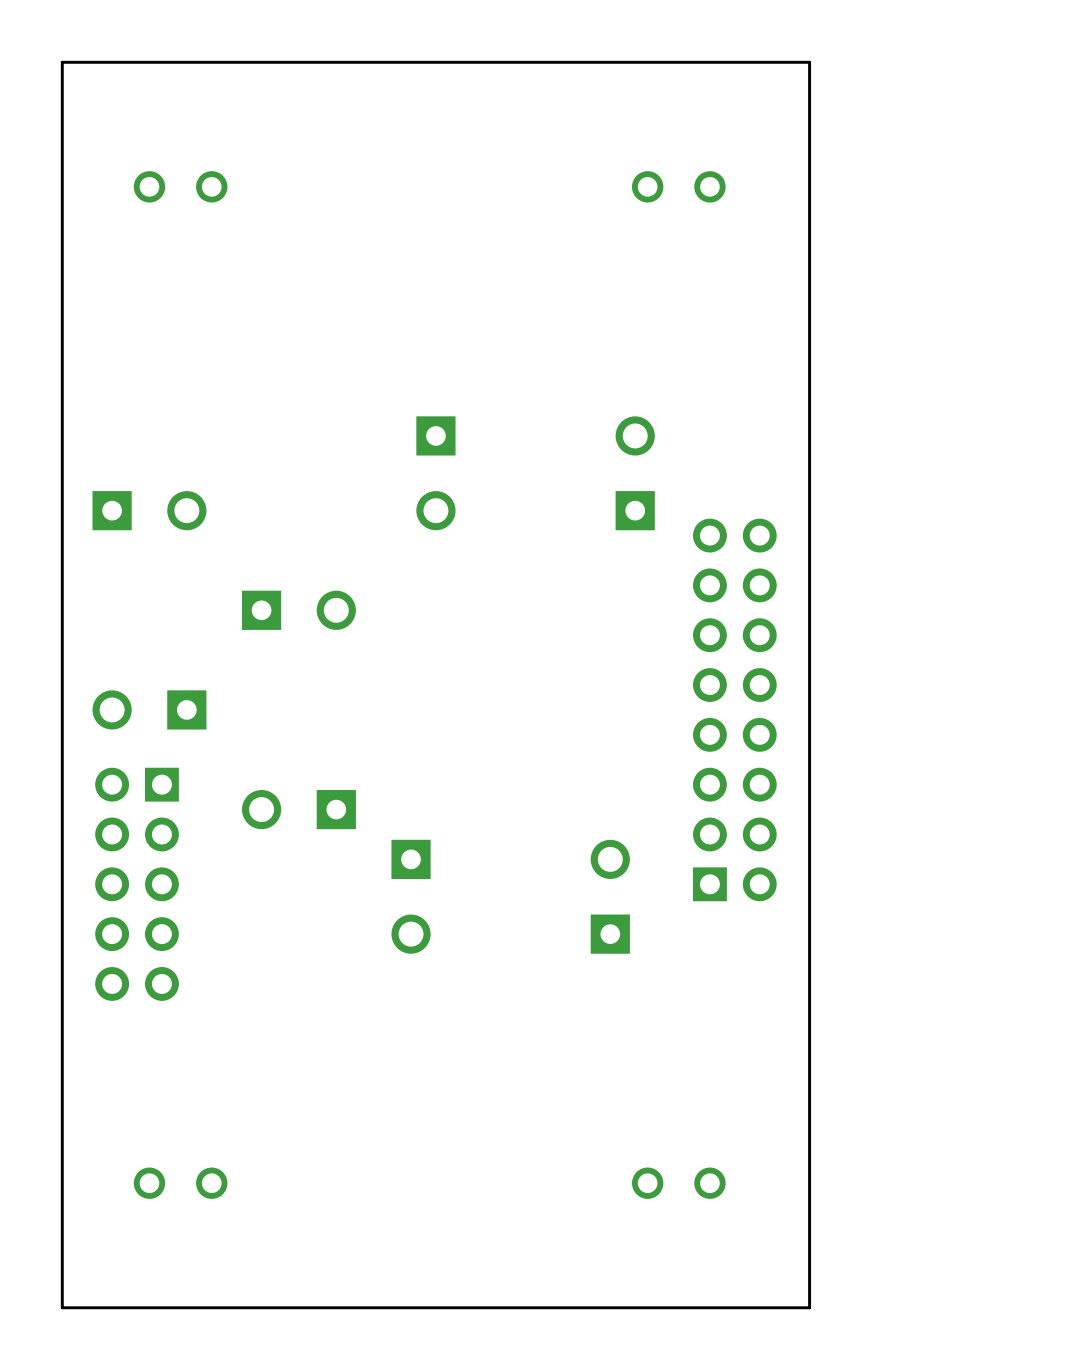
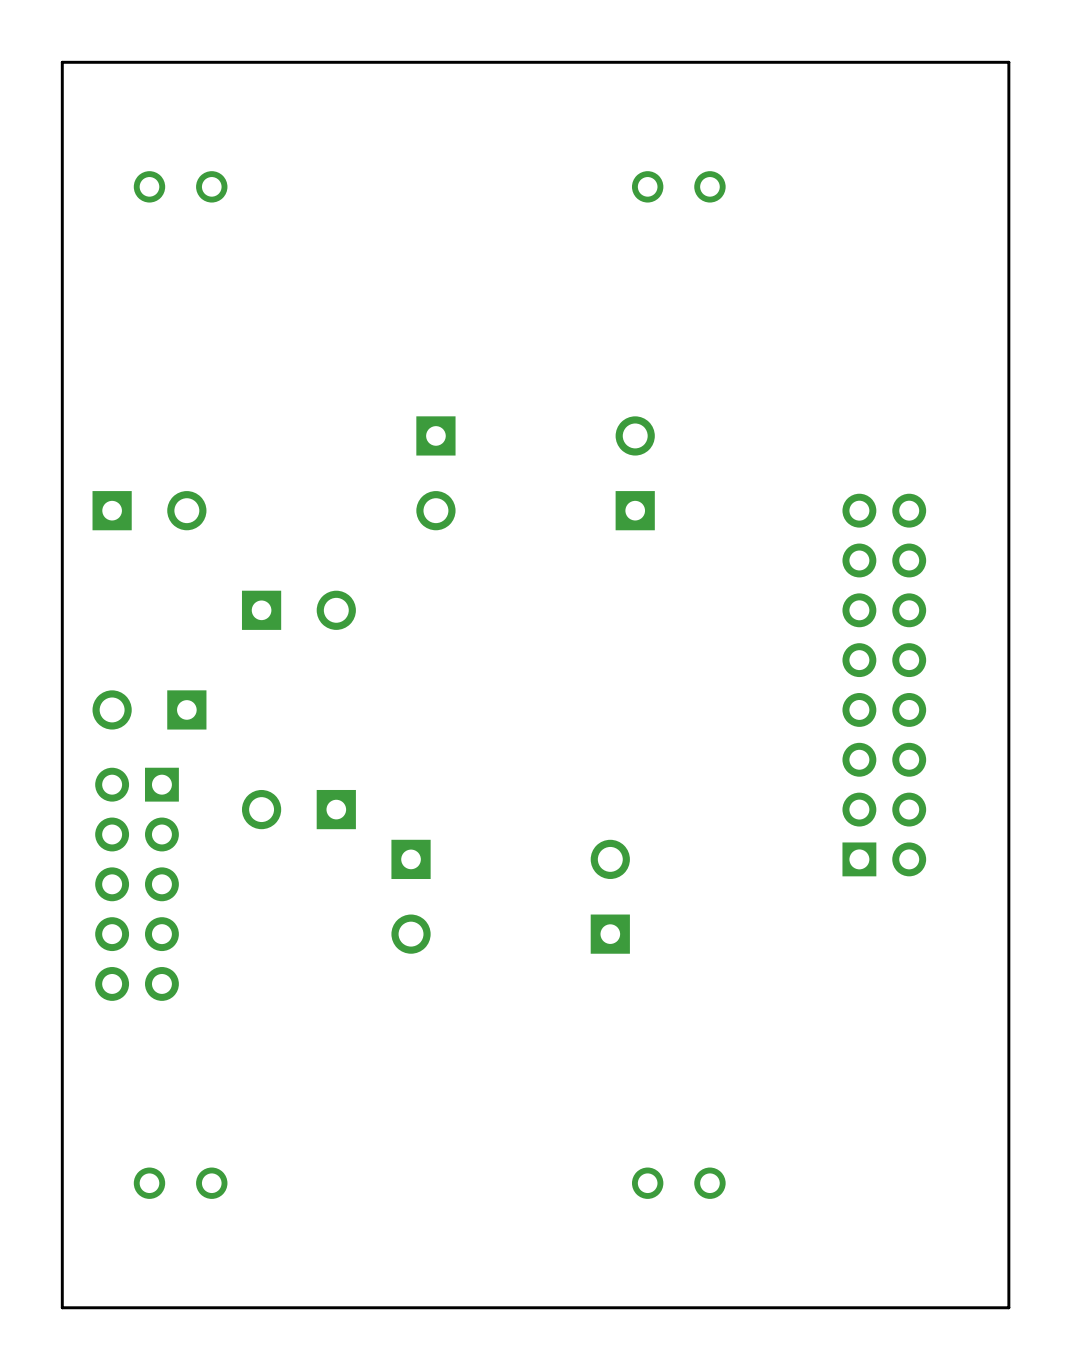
board edge: (809, 62) (809, 1307) -> (809, 62) (1008, 62) (1008, 1307) (809, 1307)
part position: (734, 709) -> (884, 685)

